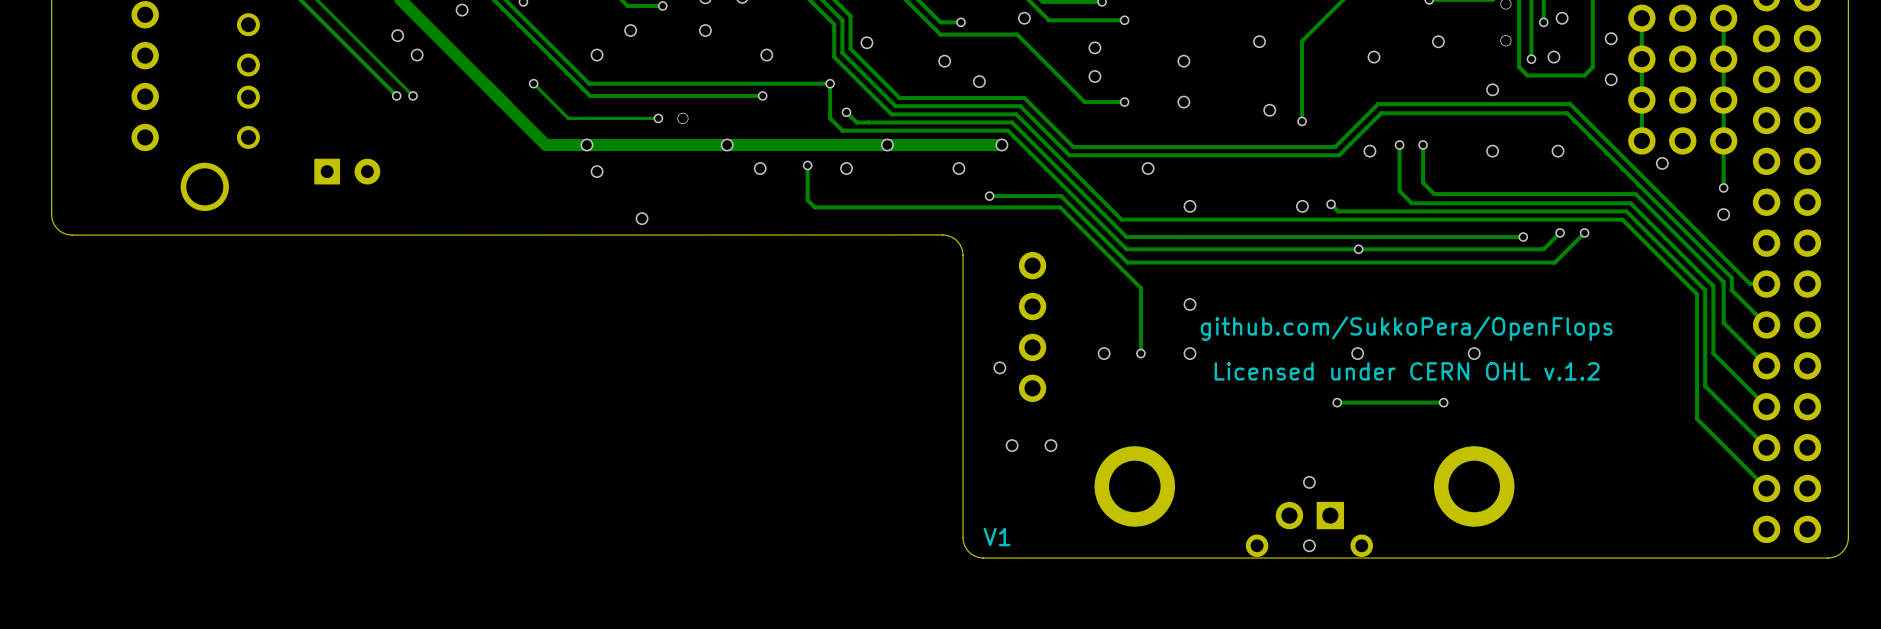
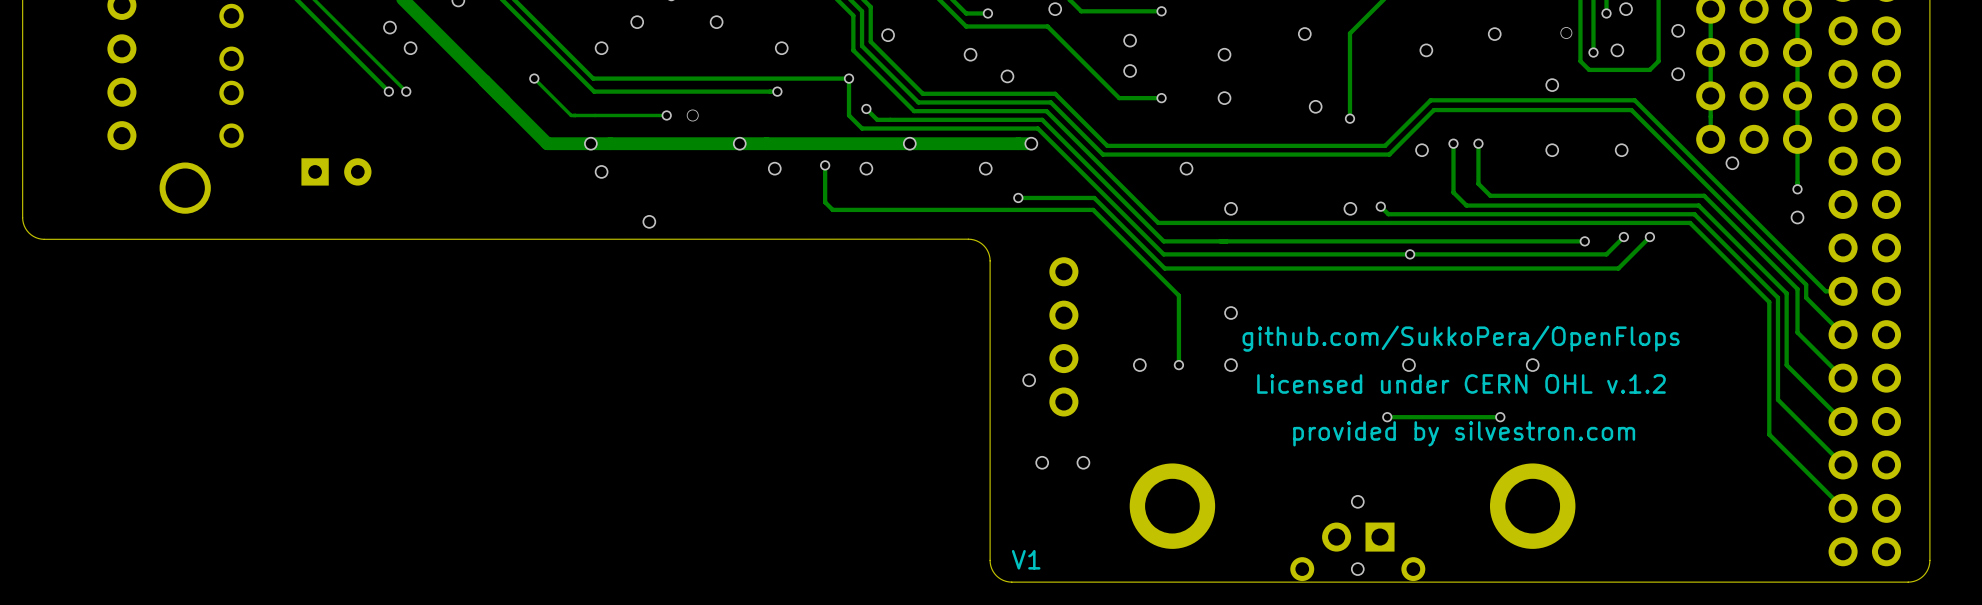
text: none -> provided by silvestron.com (1464, 433)

